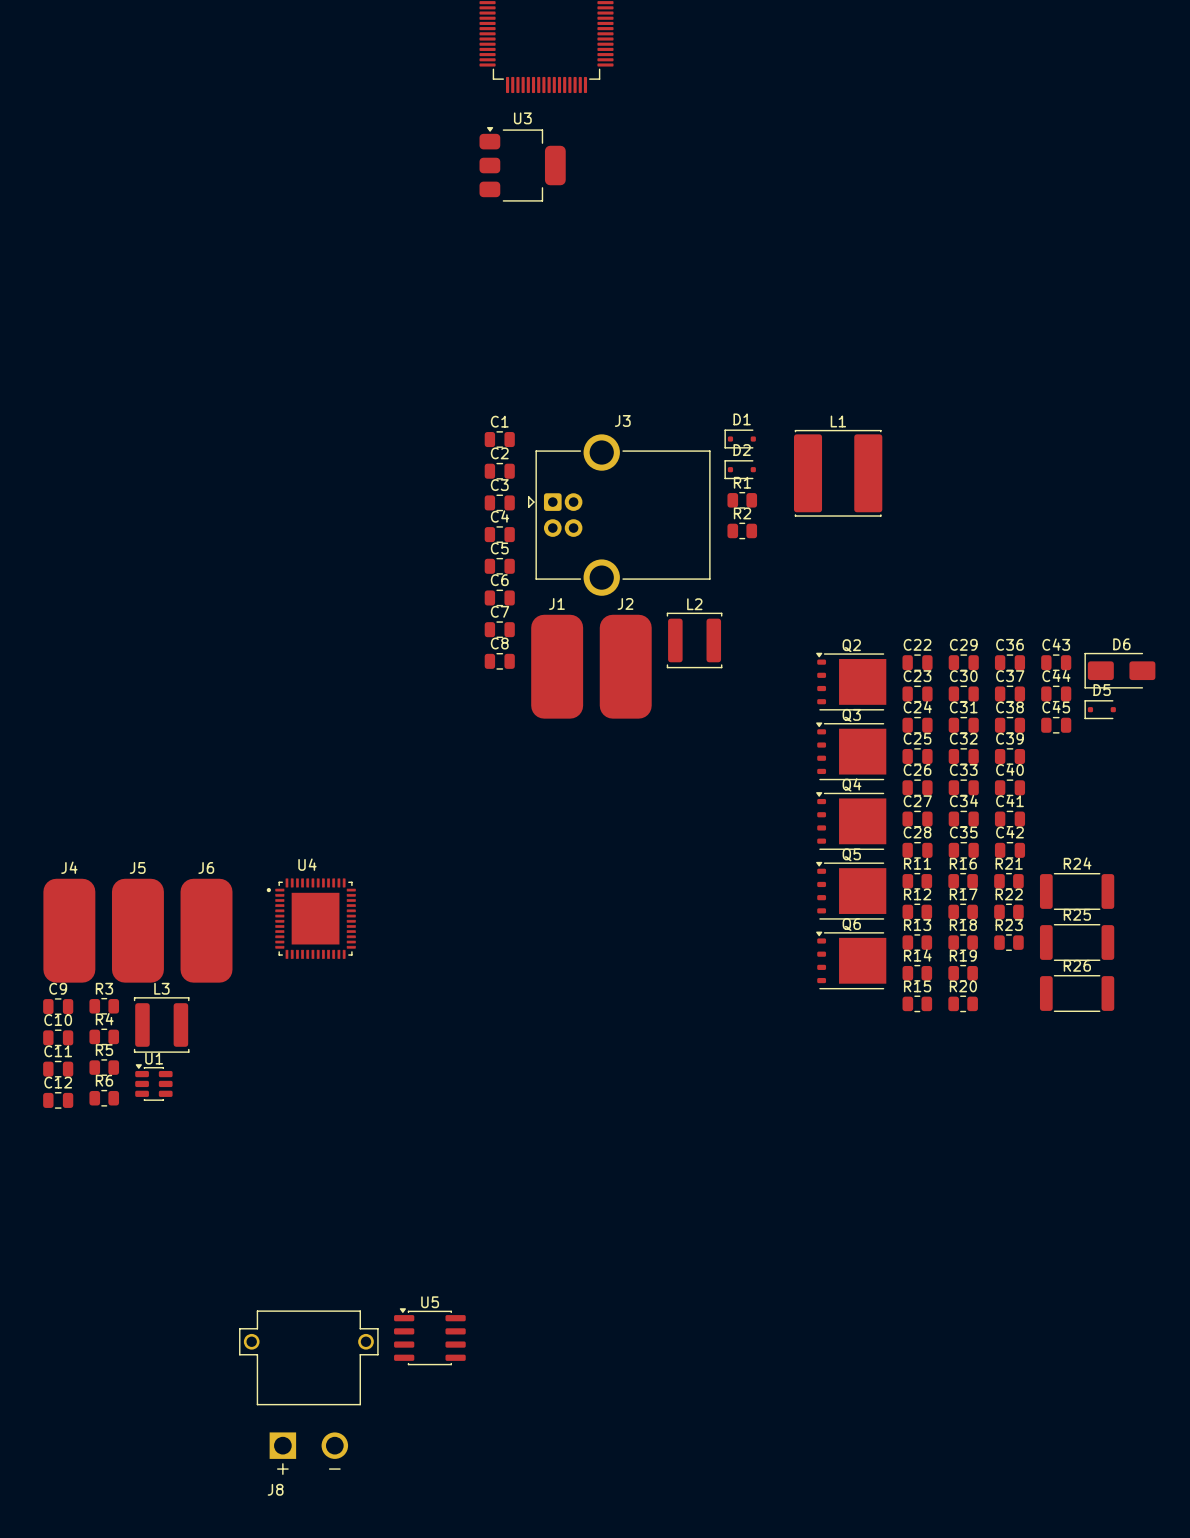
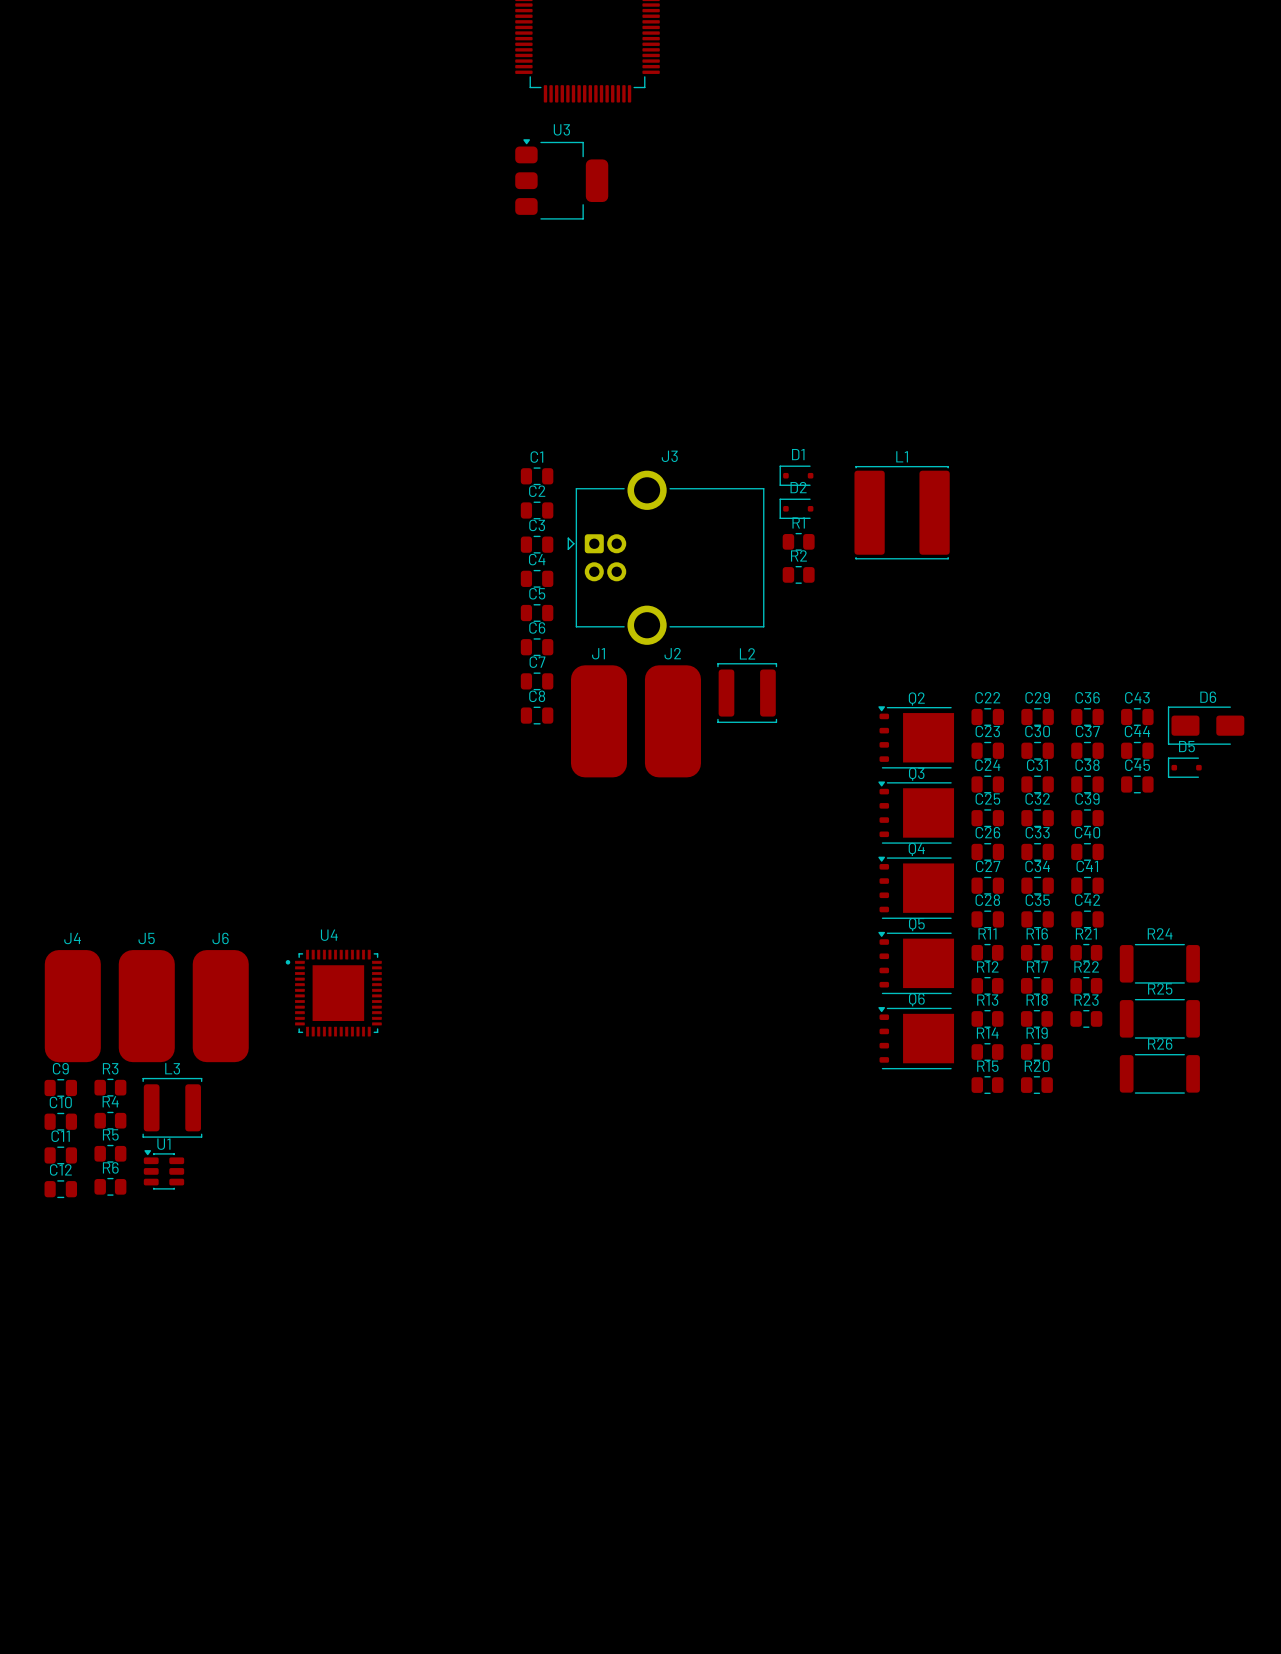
U5: (429, 1336) -> none
J8: (308, 1392) -> none

